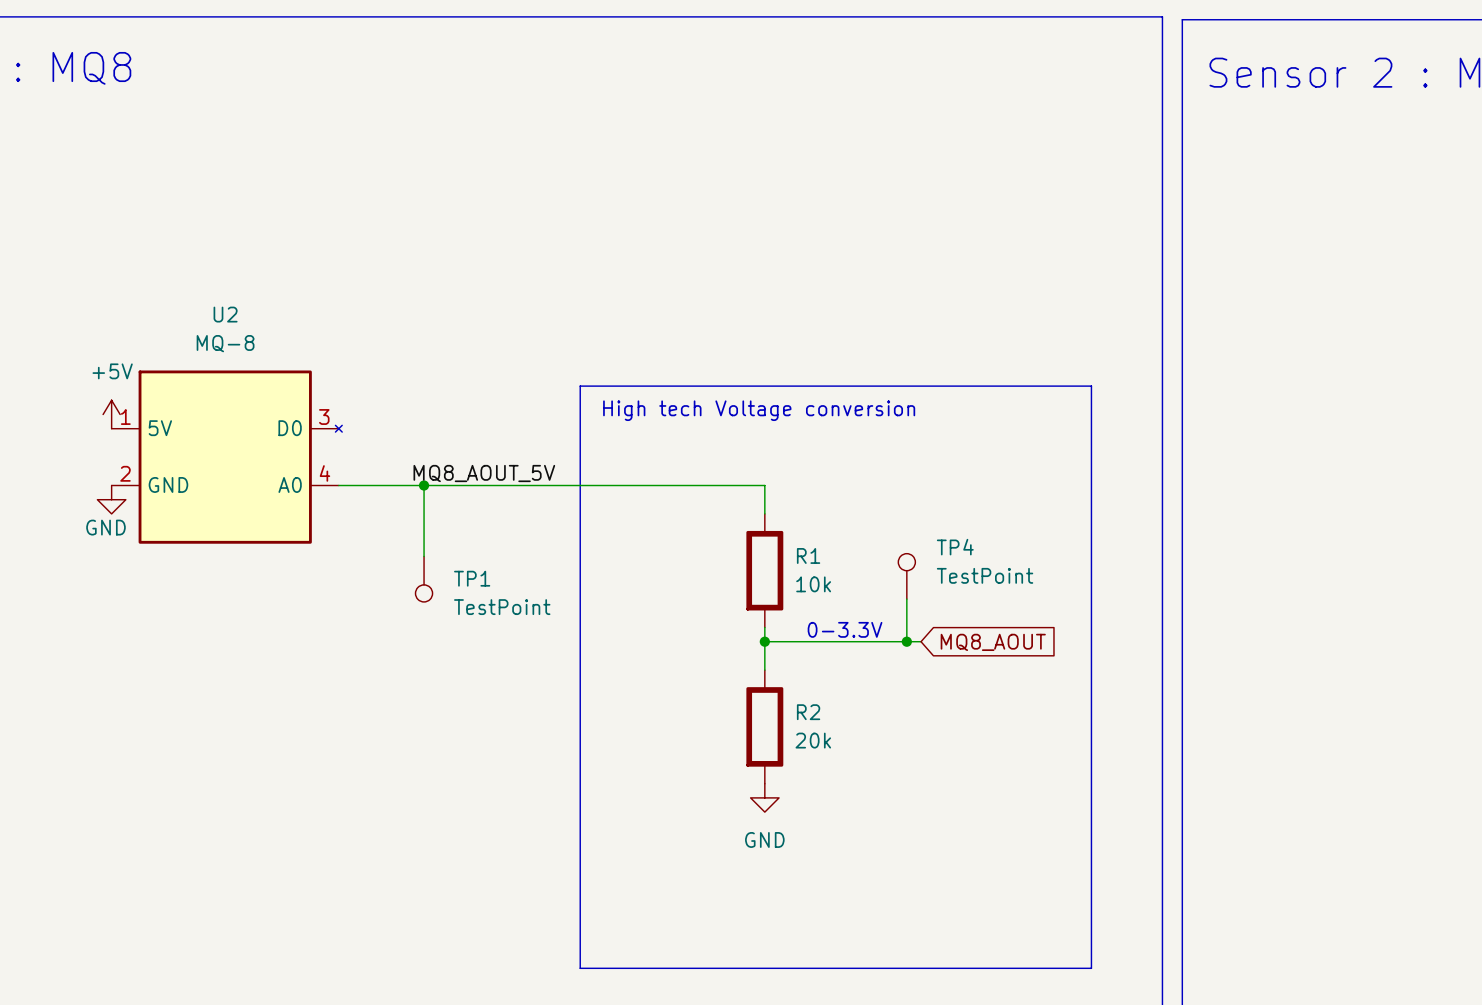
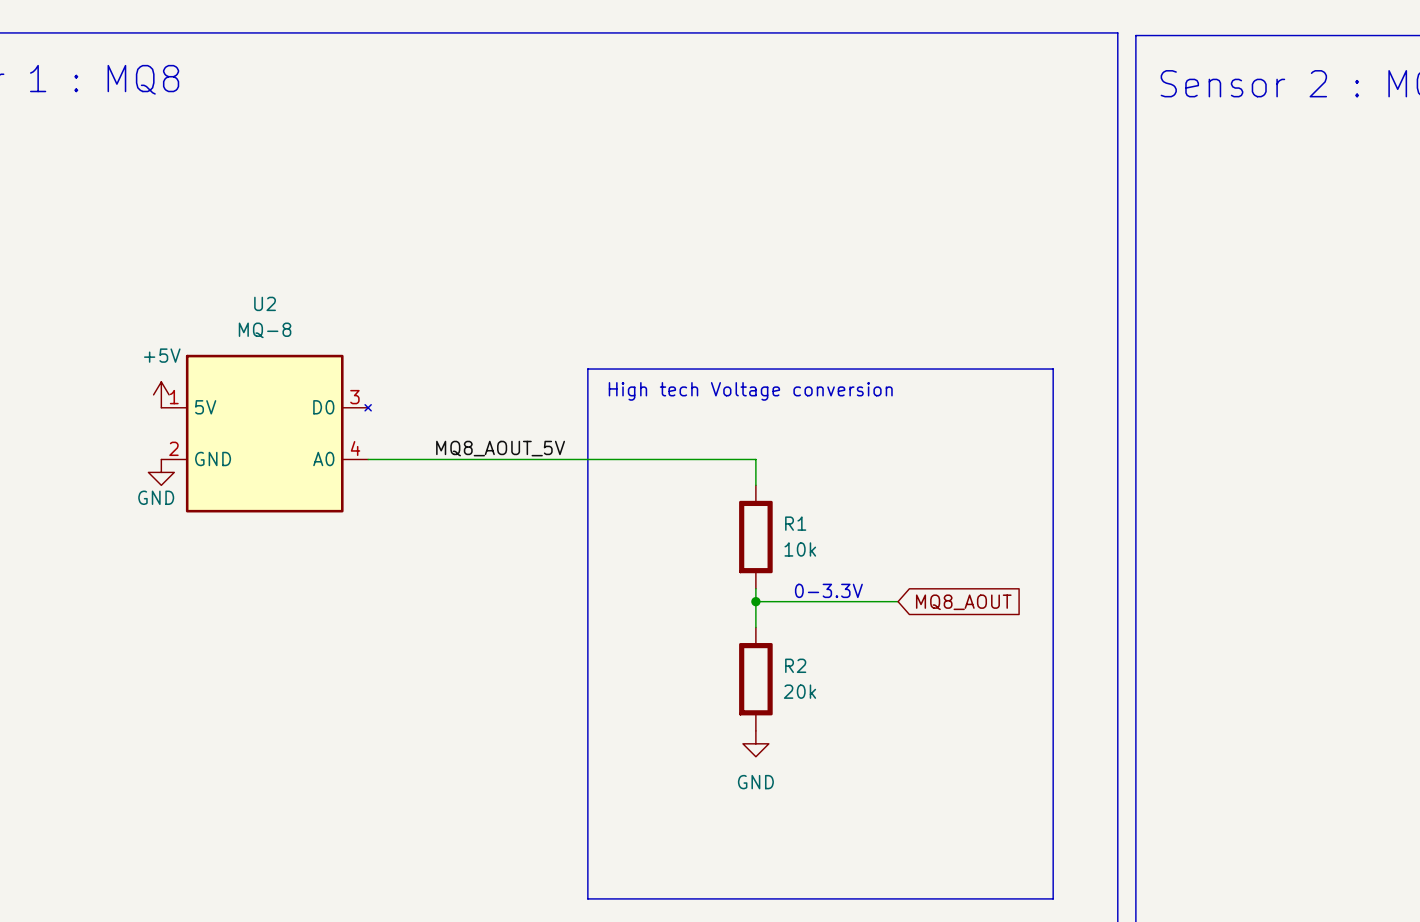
wire: (424, 485) (424, 556) -> none
junction: (424, 485) -> none
TP4: TestPoint (906, 576) -> none
TP1: TestPoint (424, 579) -> none
wire: (906, 599) (906, 641) -> none
junction: (906, 641) -> none

